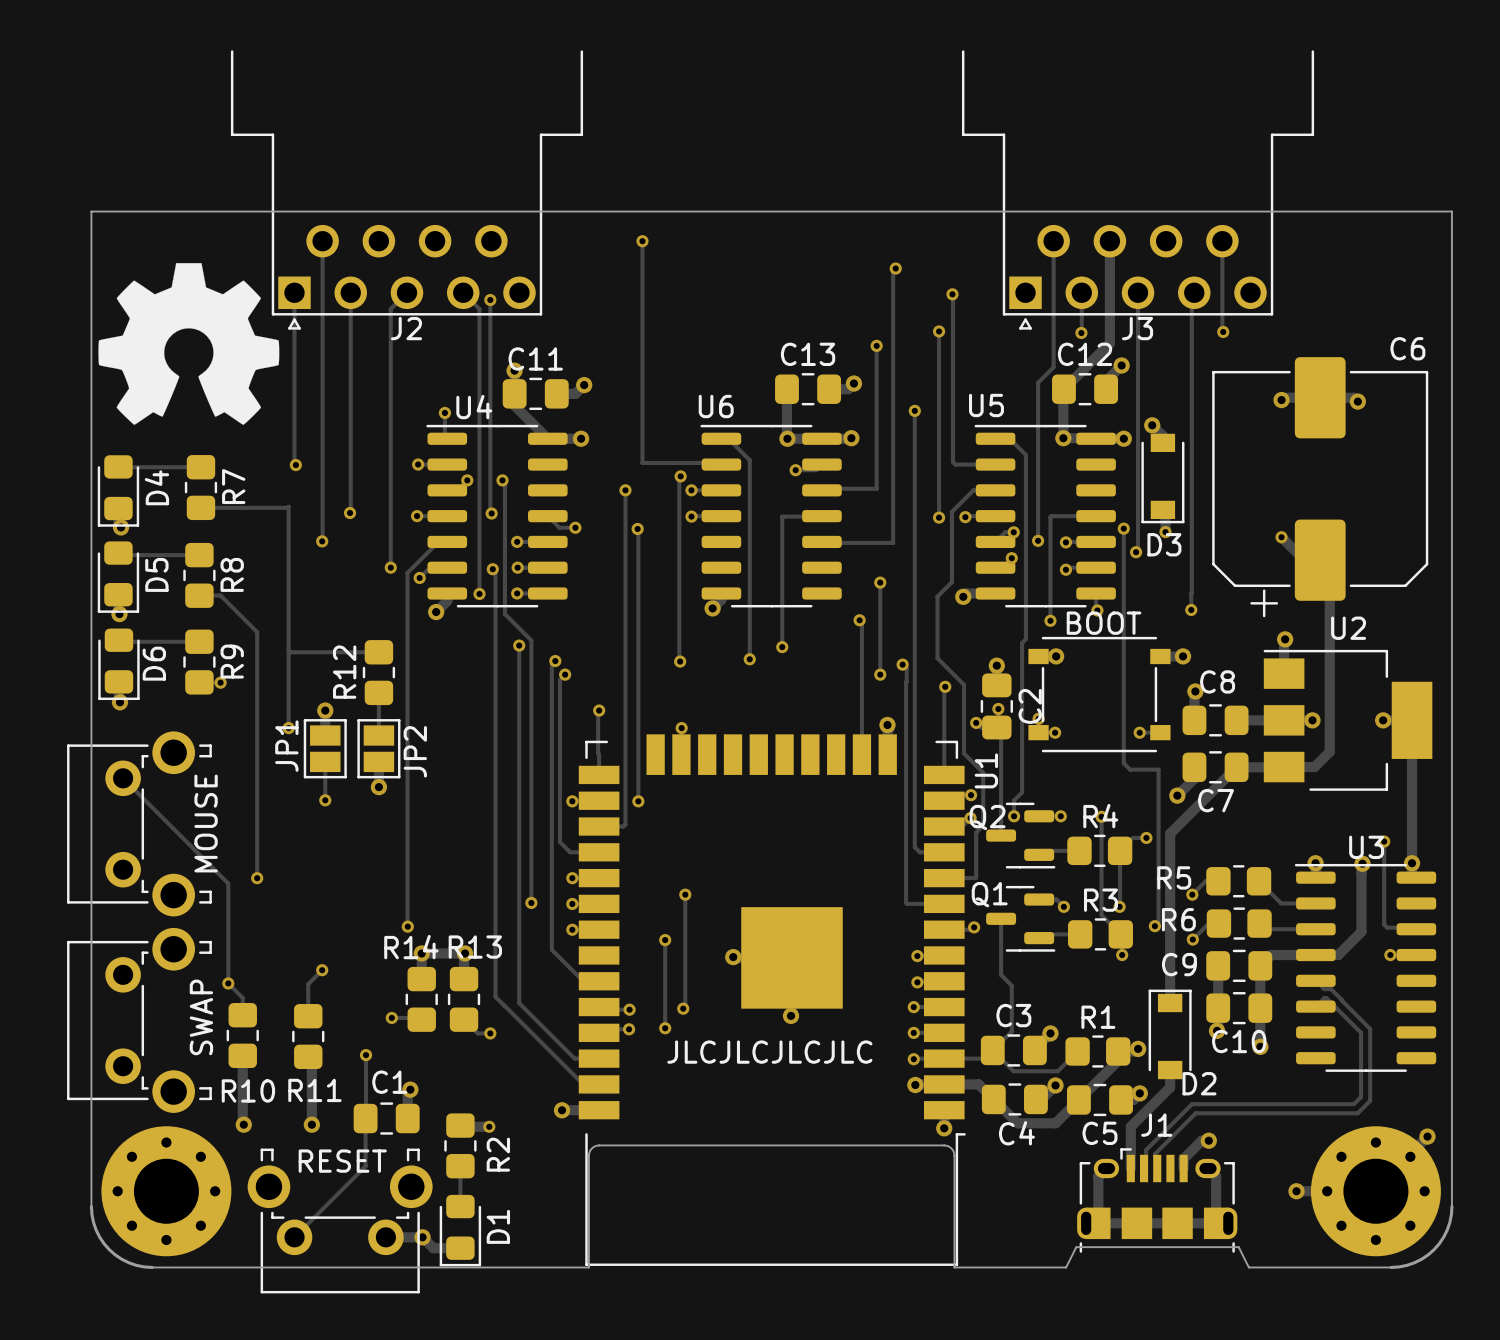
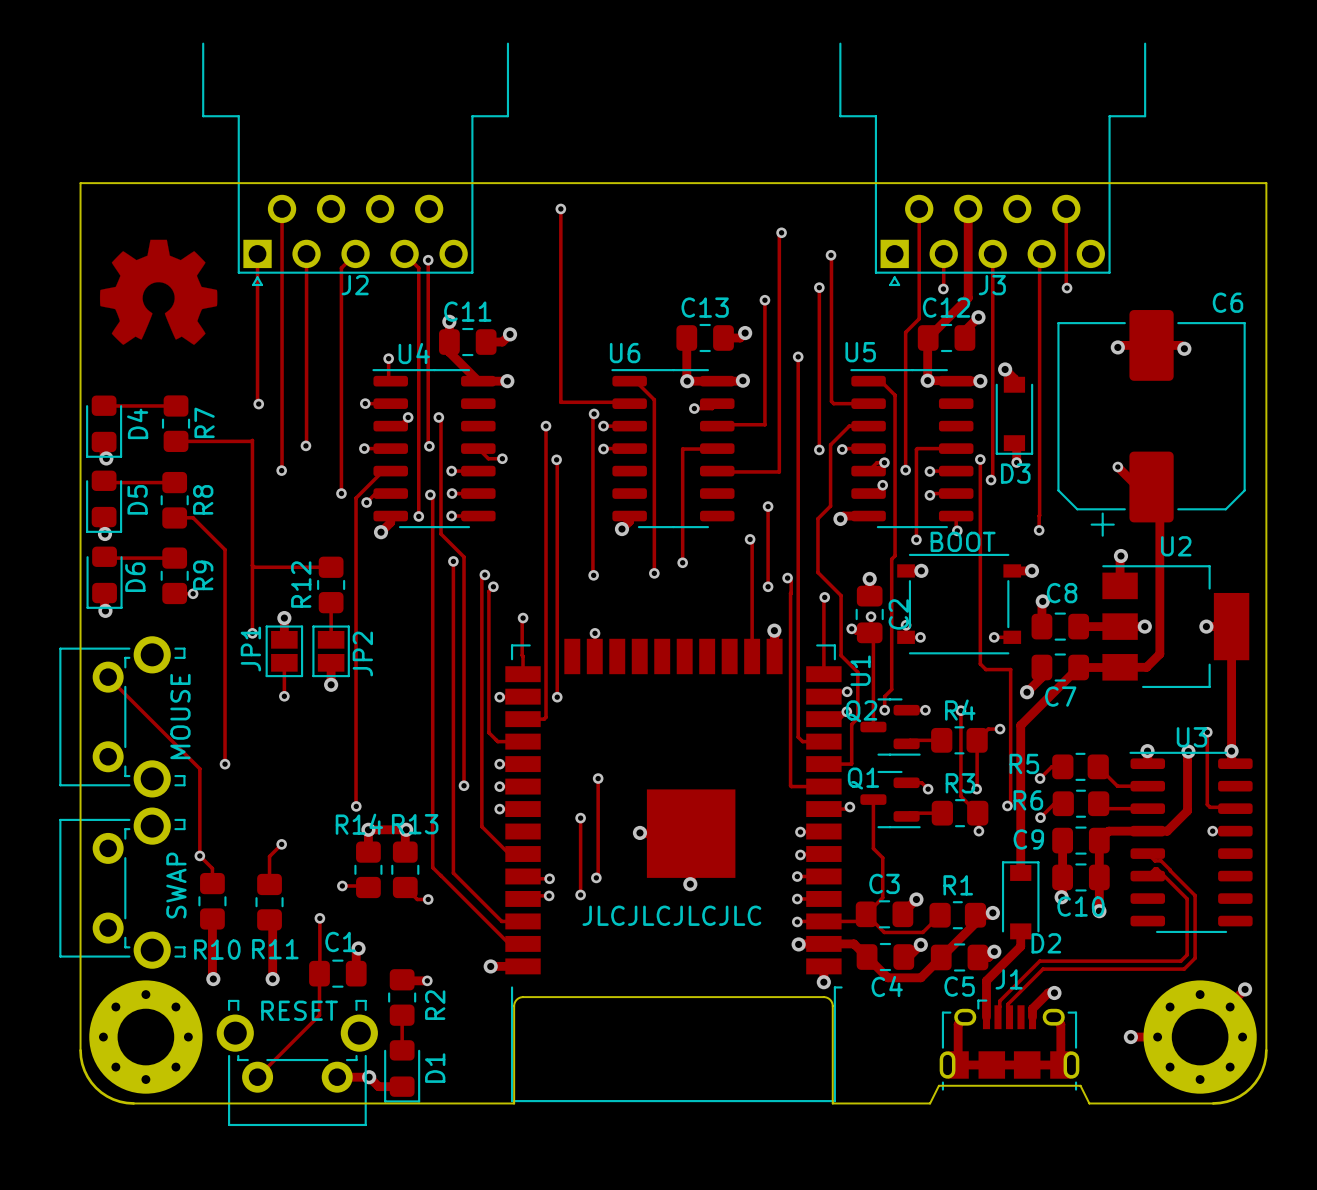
drawing shape: [98, 263, 280, 425] -> [99, 239, 218, 345]

